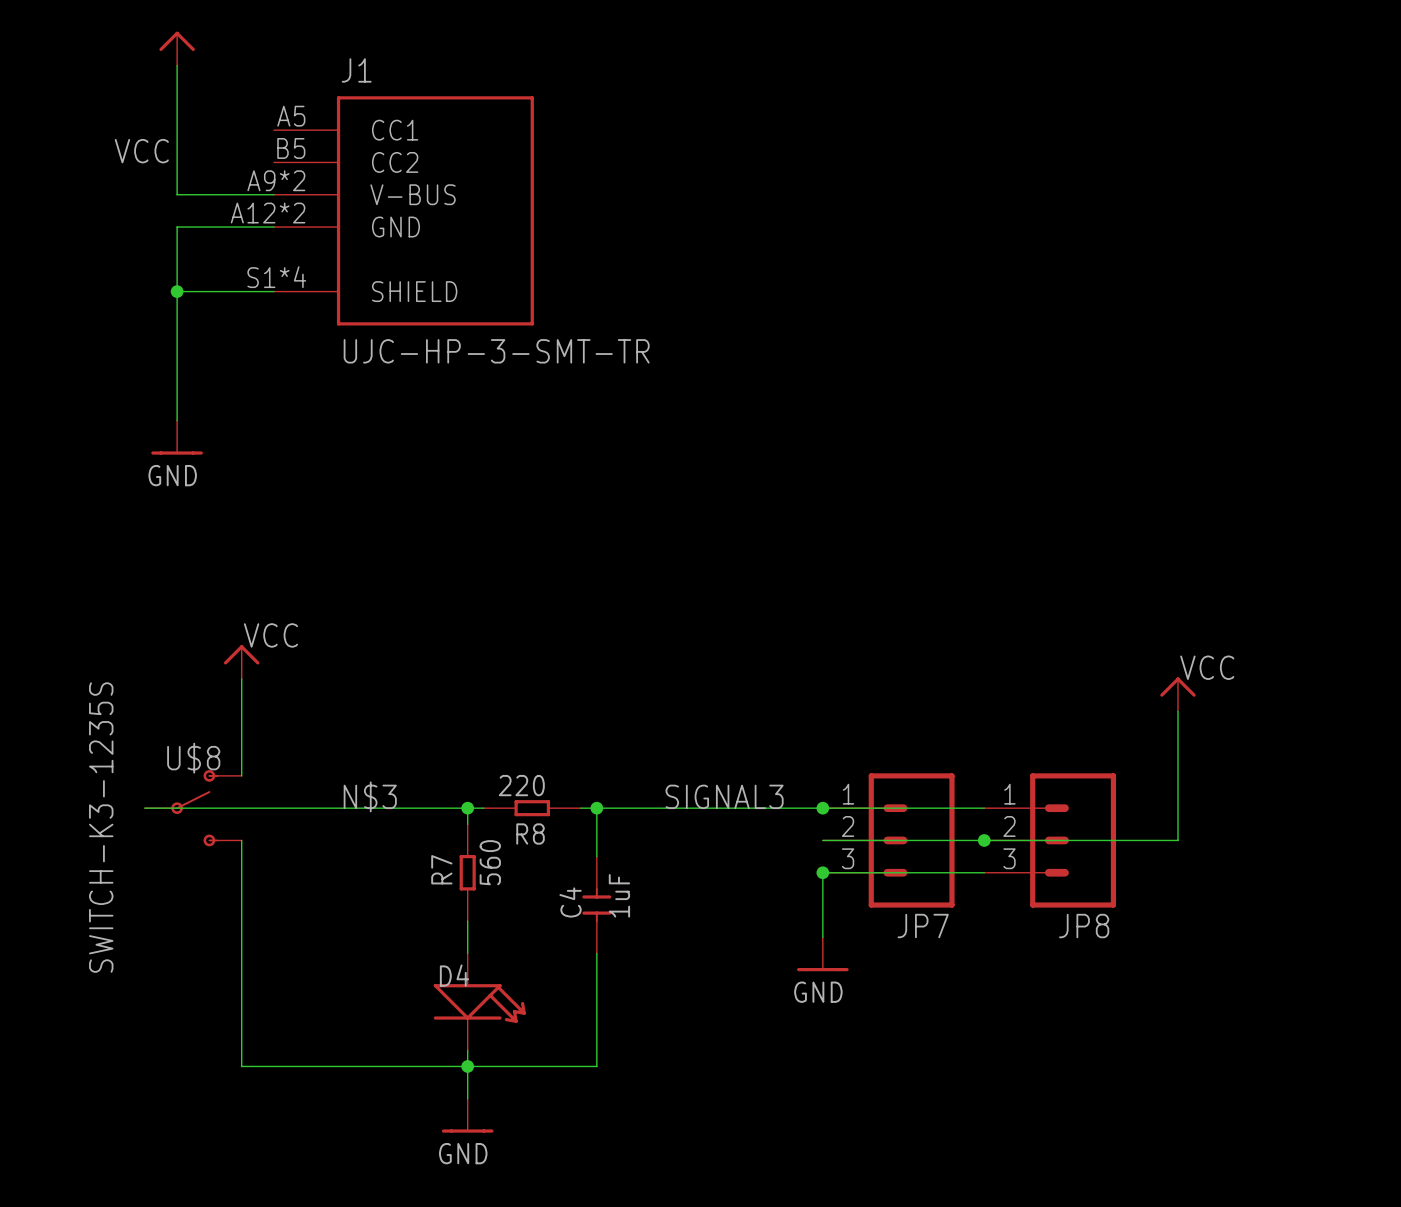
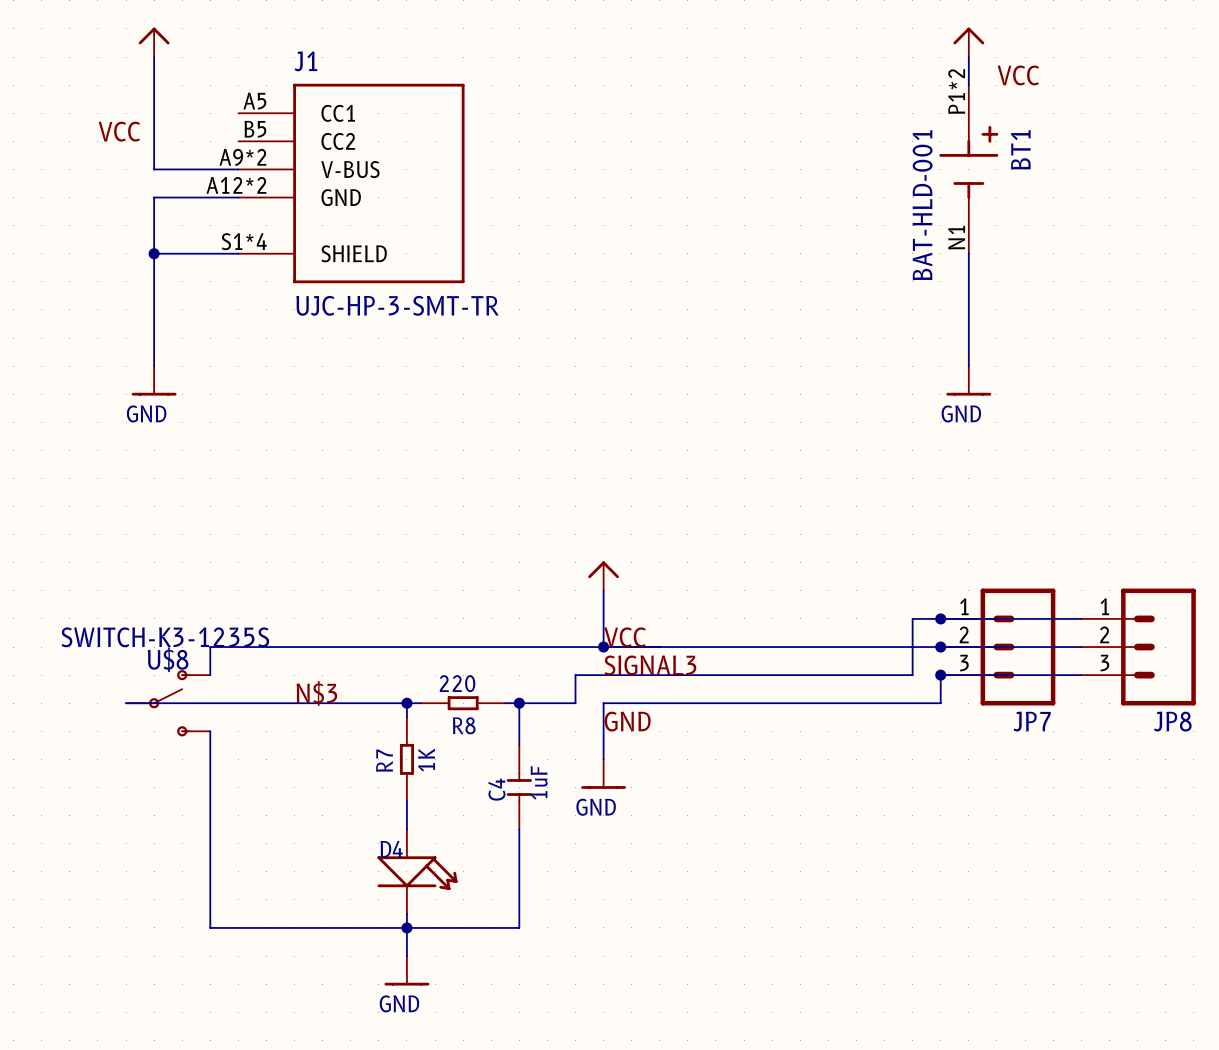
power symbol: none -> (968, 42)
wire: none -> (968, 57) (968, 85)
label: none -> VCC (1018, 75)
BT1: none -> BAT-HLD-001 (968, 169)
wire: none -> (968, 253) (968, 366)
power symbol: none -> GND (968, 380)
label: VCC (270, 635) -> none
power symbol: (241, 662) -> none
power symbol: none -> (603, 576)
label: VCC (1207, 667) -> none
wire: (241, 679) (241, 743) -> (1081, 647) (210, 647)
wire: none -> (603, 590) (603, 647)
power symbol: (1177, 694) -> none
junction: none -> (940, 618)
wire: (1177, 711) (1177, 840) (822, 840) -> none
wire: none -> (1081, 618) (912, 618) (912, 675) (575, 675) (575, 703)
label: none -> VCC (625, 637)
junction: none -> (603, 647)
junction: none -> (940, 647)
junction: none -> (940, 675)
wire: none -> (1081, 675) (940, 675) (940, 703) (856, 703)
label position: SIGNAL3 (724, 796) -> SIGNAL3 (650, 665)
wire: (661, 808) (693, 808) -> (603, 759) (603, 703)
junction: (822, 808) -> none
U$8 value rotation: 0° (101, 827) -> 90° clockwise (165, 637)
label: none -> GND (627, 721)
JP7 position: (888, 840) -> (998, 647)
junction: (984, 840) -> none
JP8 position: (1050, 840) -> (1138, 647)
R7 value: 560 (490, 862) -> 1K (426, 760)
junction: (822, 872) -> none
wire: (984, 872) (822, 872) (822, 937) -> none
power symbol position: GND (822, 954) -> GND (603, 774)

